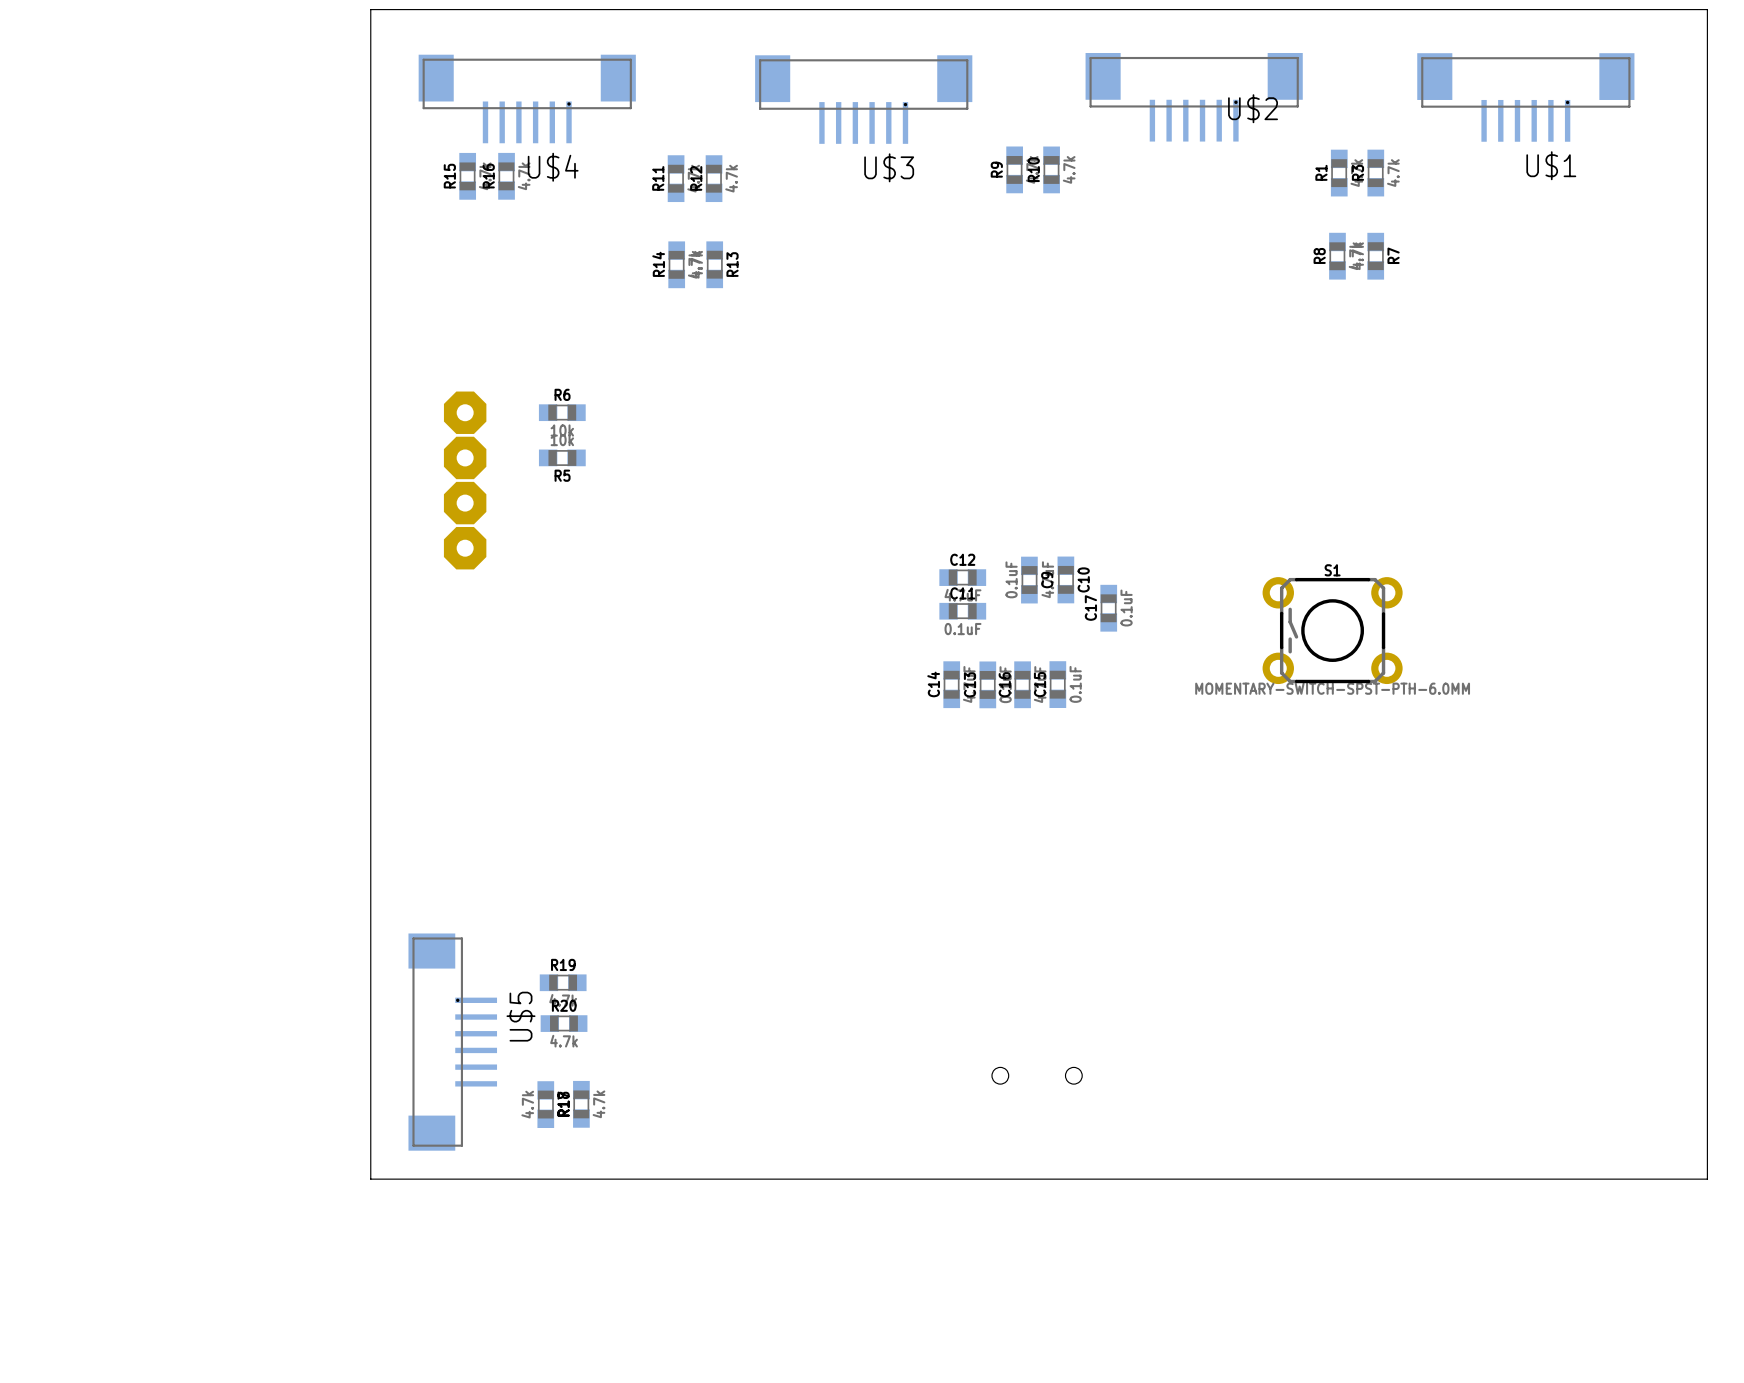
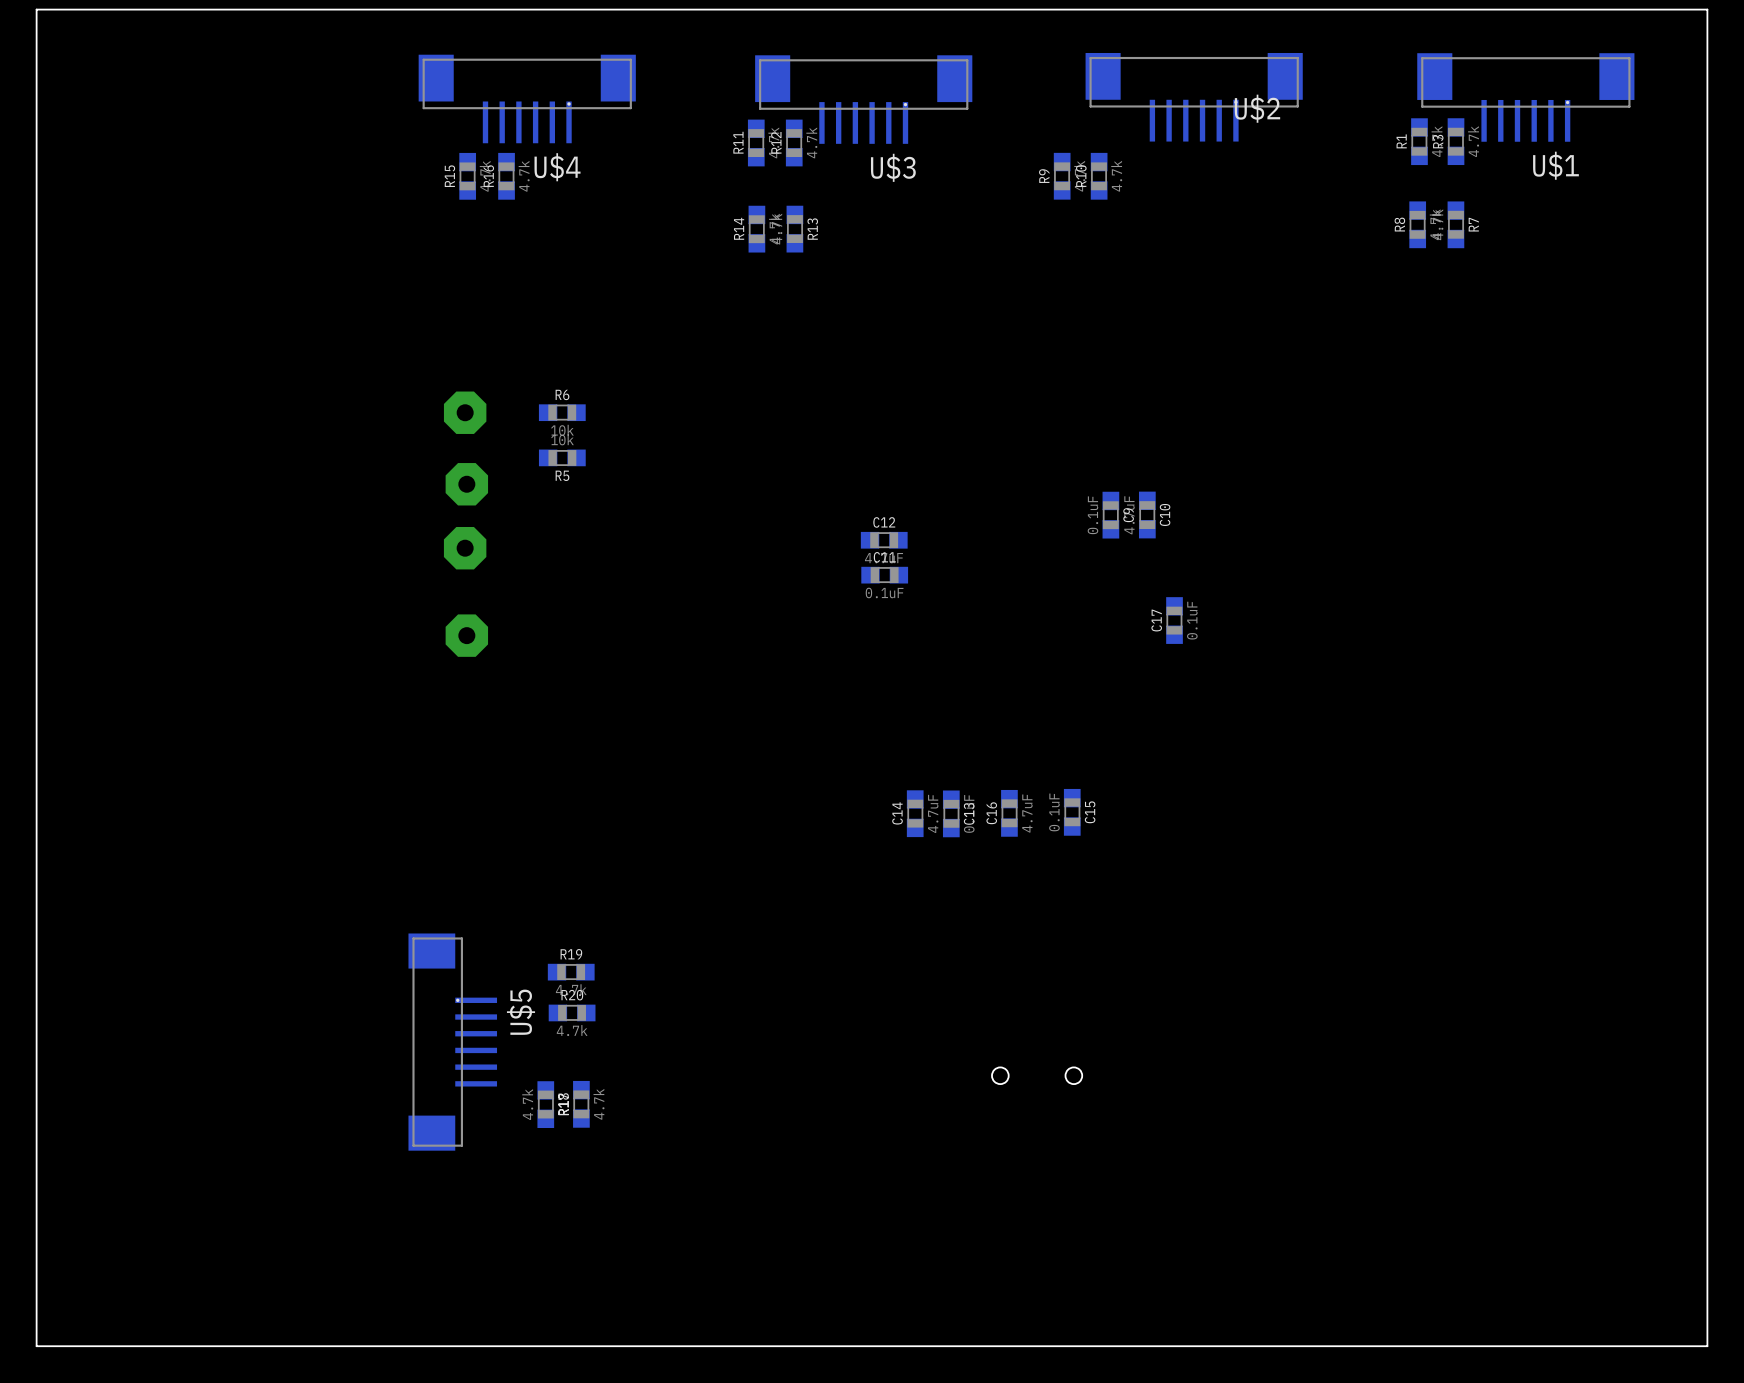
board edge: (370, 9) (370, 1179) (1707, 1179) -> (370, 9) (36, 9) (36, 1346) (1707, 1346) (1707, 1179)
R9 position: (1014, 169) -> (1062, 176)
R10 position: (1051, 169) -> (1099, 176)
R1 position: (1339, 173) -> (1419, 141)
R3 position: (1375, 173) -> (1456, 141)
R11 position: (676, 178) -> (756, 142)
R12 position: (714, 178) -> (794, 142)
R8 position: (1337, 256) -> (1417, 224)
R7 position: (1375, 256) -> (1455, 224)
R14 position: (676, 264) -> (756, 229)
R13 position: (714, 264) -> (794, 229)
part: (465, 457) -> none
part: none -> (466, 484)
part: (465, 503) -> none
C12 position: (962, 577) -> (884, 540)
C10 position: (1065, 579) -> (1147, 515)
C9 position: (1029, 580) -> (1110, 515)
C17 position: (1108, 608) -> (1174, 620)
C11 position: (962, 611) -> (884, 575)
S1: MOMENTARY-SWITCH-SPST-PTH-6.0MM (1332, 630) -> none
part: none -> (466, 635)
C14 position: (951, 684) -> (915, 813)
C13 name position: C13 (969, 684) -> C13 (969, 813)
C13 position: (987, 684) -> (951, 813)
C16 position: (1022, 684) -> (1009, 813)
C15 name position: C15 (1040, 684) -> C15 (1090, 812)
C15 position: (1057, 684) -> (1072, 812)
C15 value position: 0.1uF (1075, 684) -> 0.1uF (1054, 812)
R19 position: (563, 982) -> (571, 972)
R20 position: (564, 1023) -> (572, 1012)

